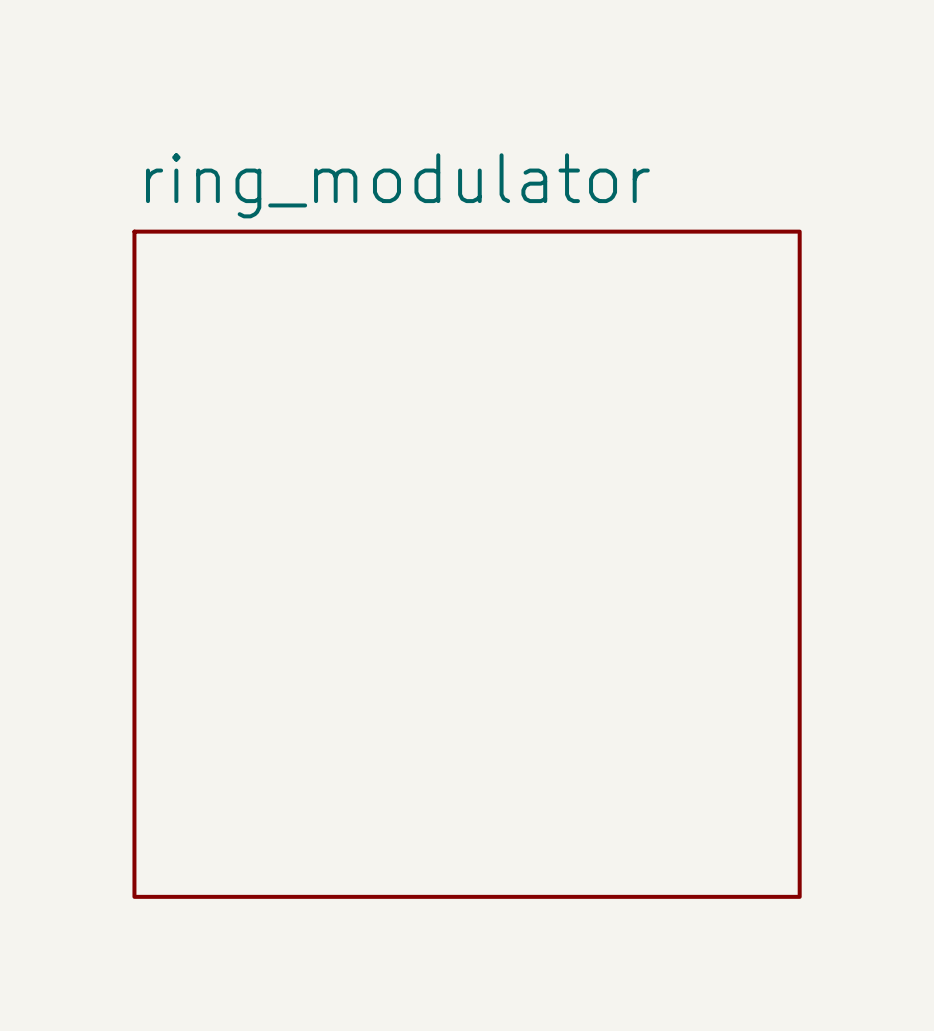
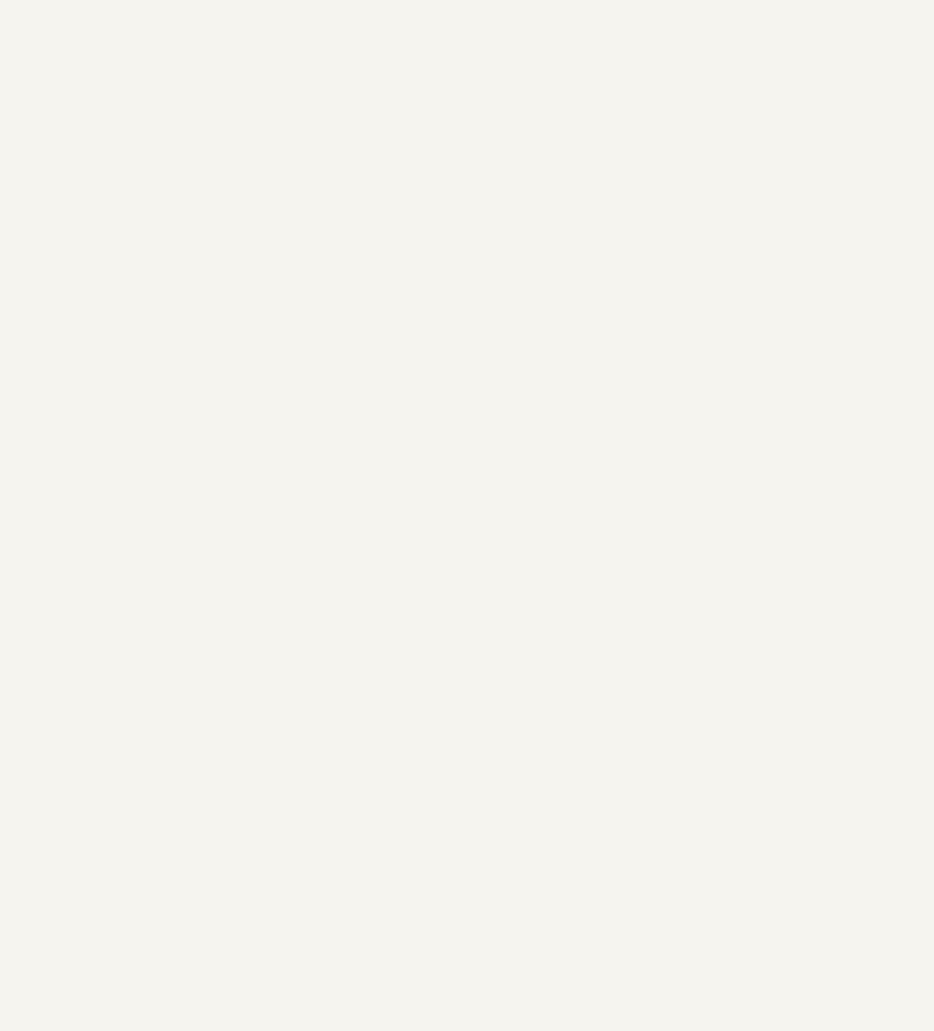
sheet ring_modulator: (467, 564) -> none

